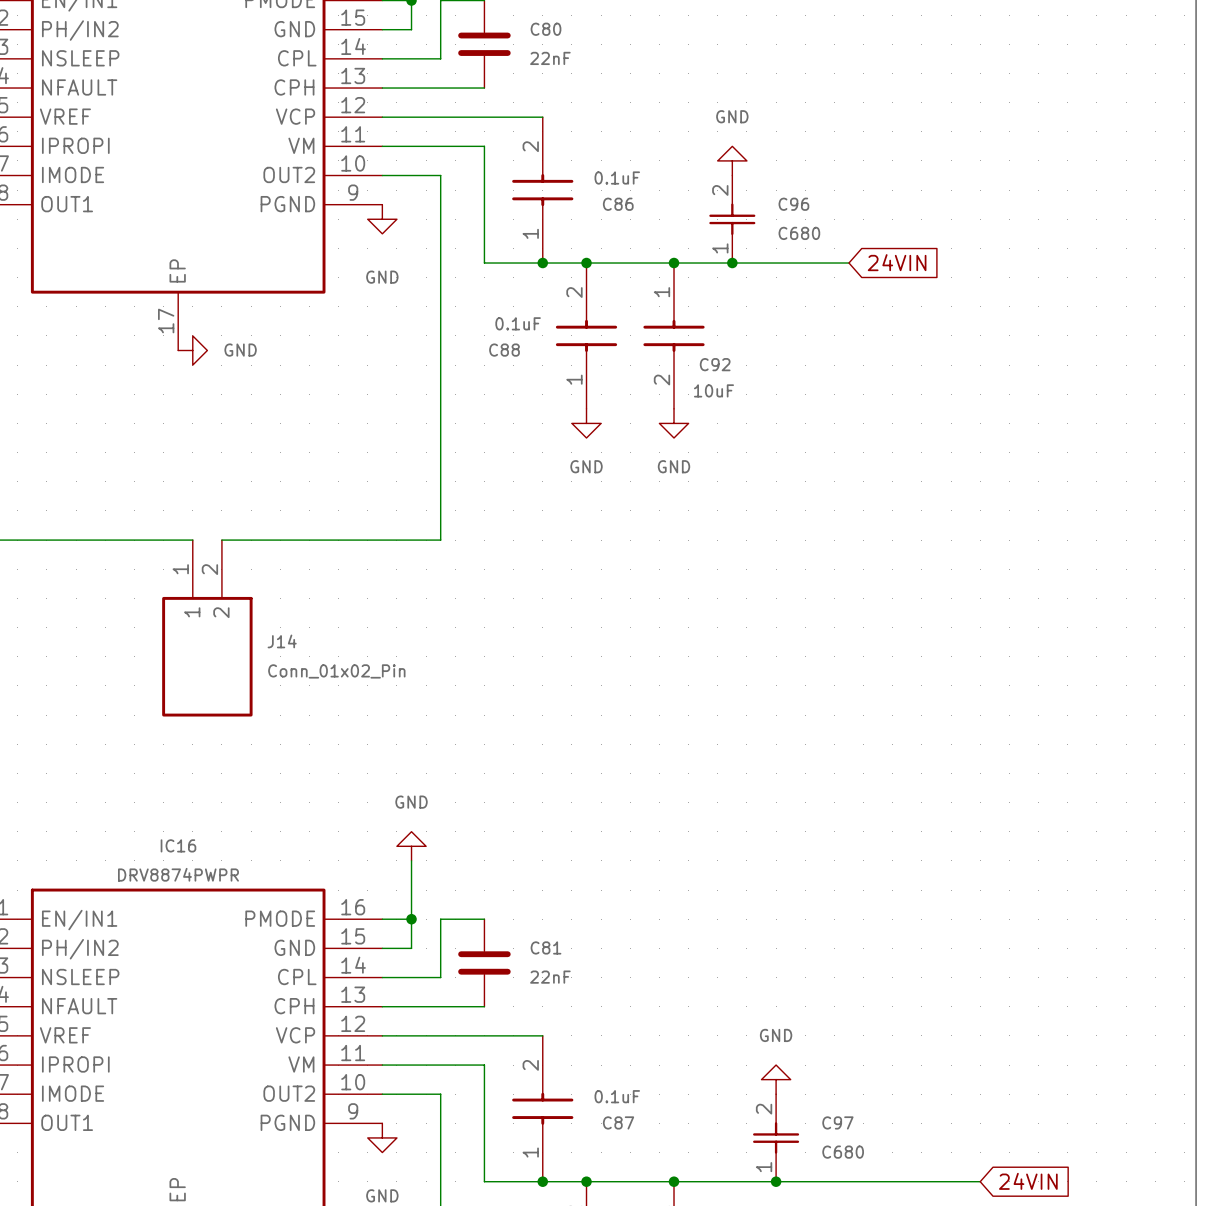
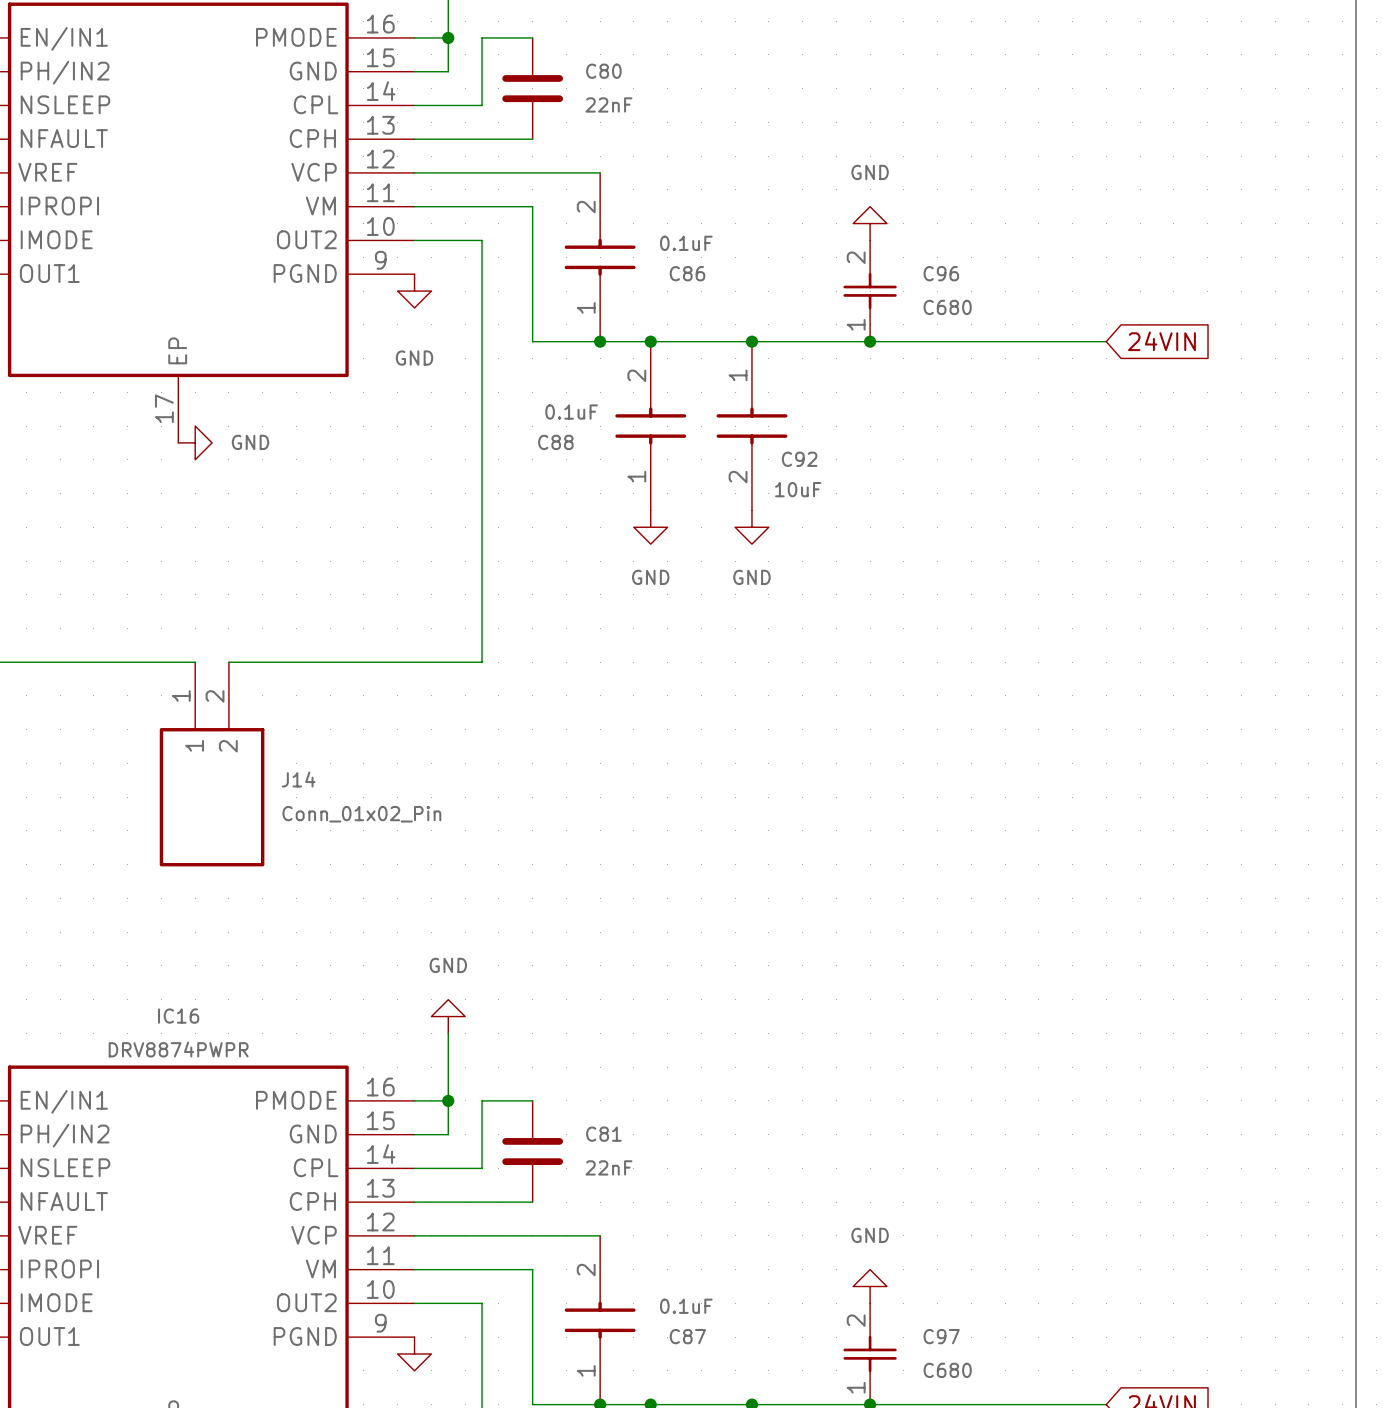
power symbol position: GND (732, 160) -> GND (870, 223)
C96 position: (732, 219) -> (870, 291)
global label position: 24VIN (897, 262) -> 24VIN (1161, 341)
junction position: (732, 263) -> (870, 341)
wire: none -> (954, 341) (1106, 341)

